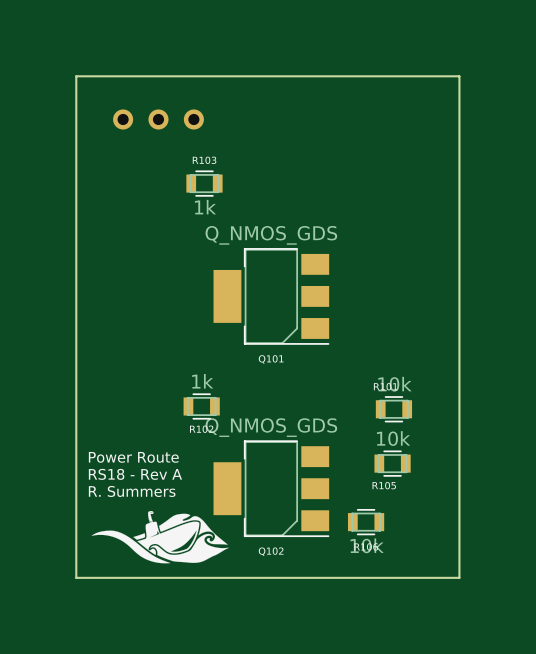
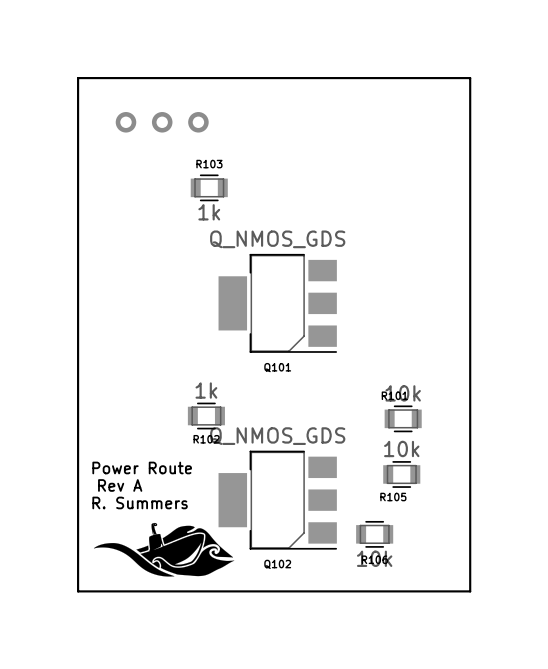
text: RS18 - Rev A (135, 474) -> Rev A (120, 485)

